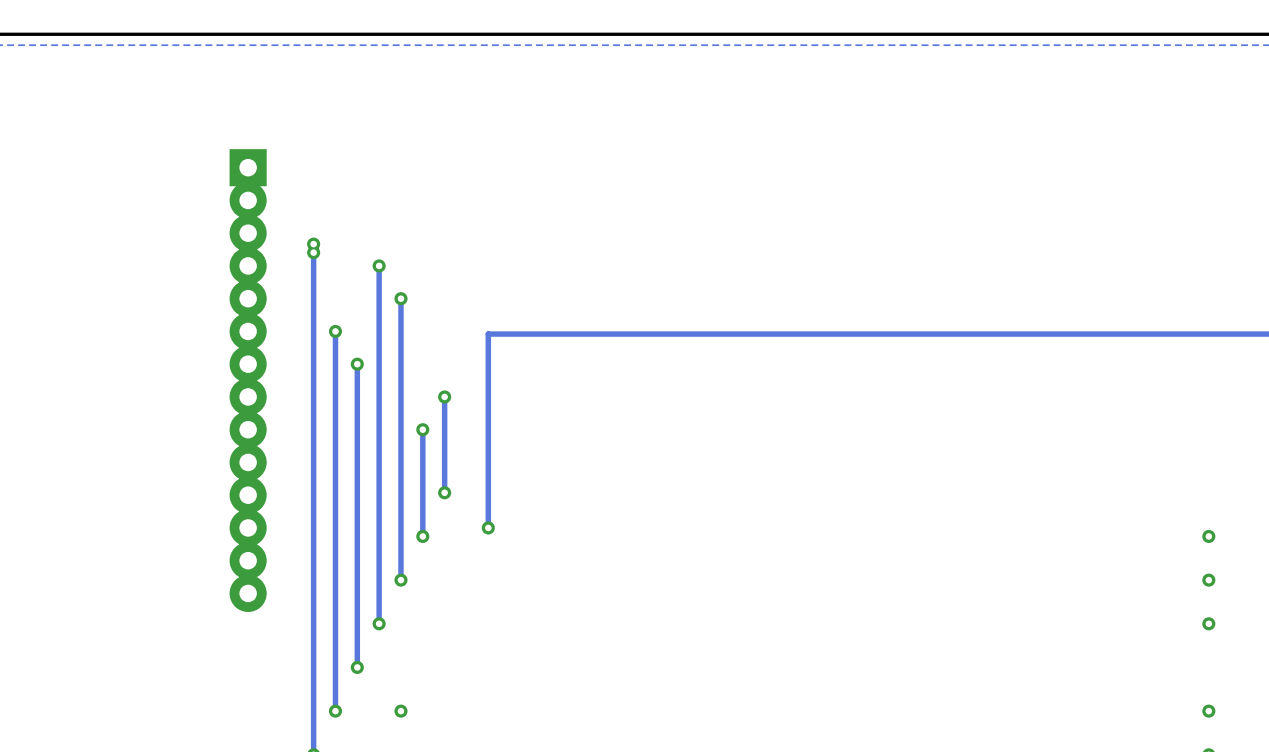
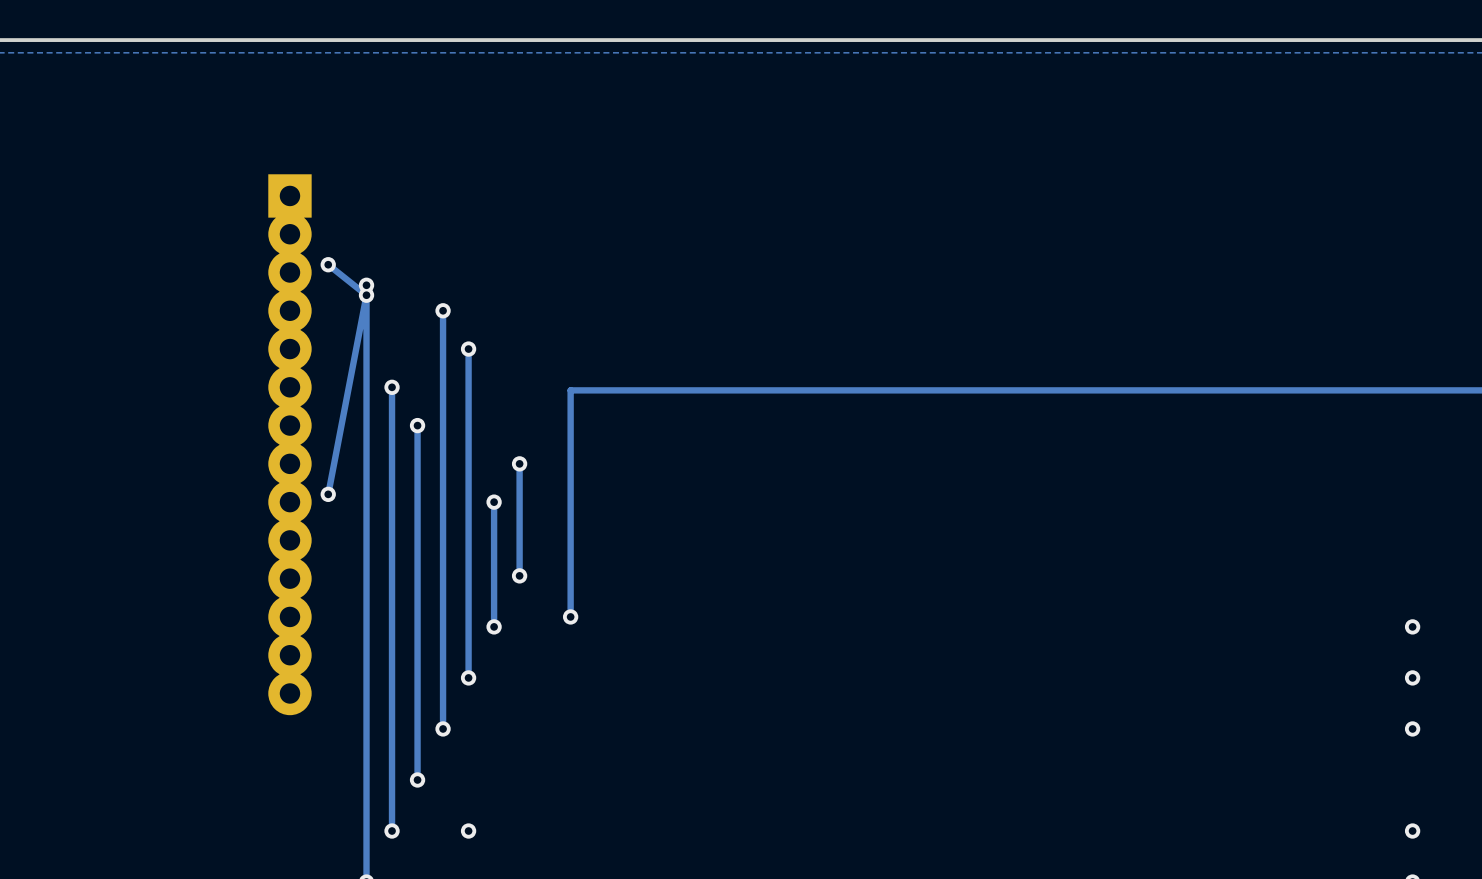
track: none -> (328, 264) (366, 295) (328, 494)
via: none -> (328, 264)
via: none -> (328, 494)

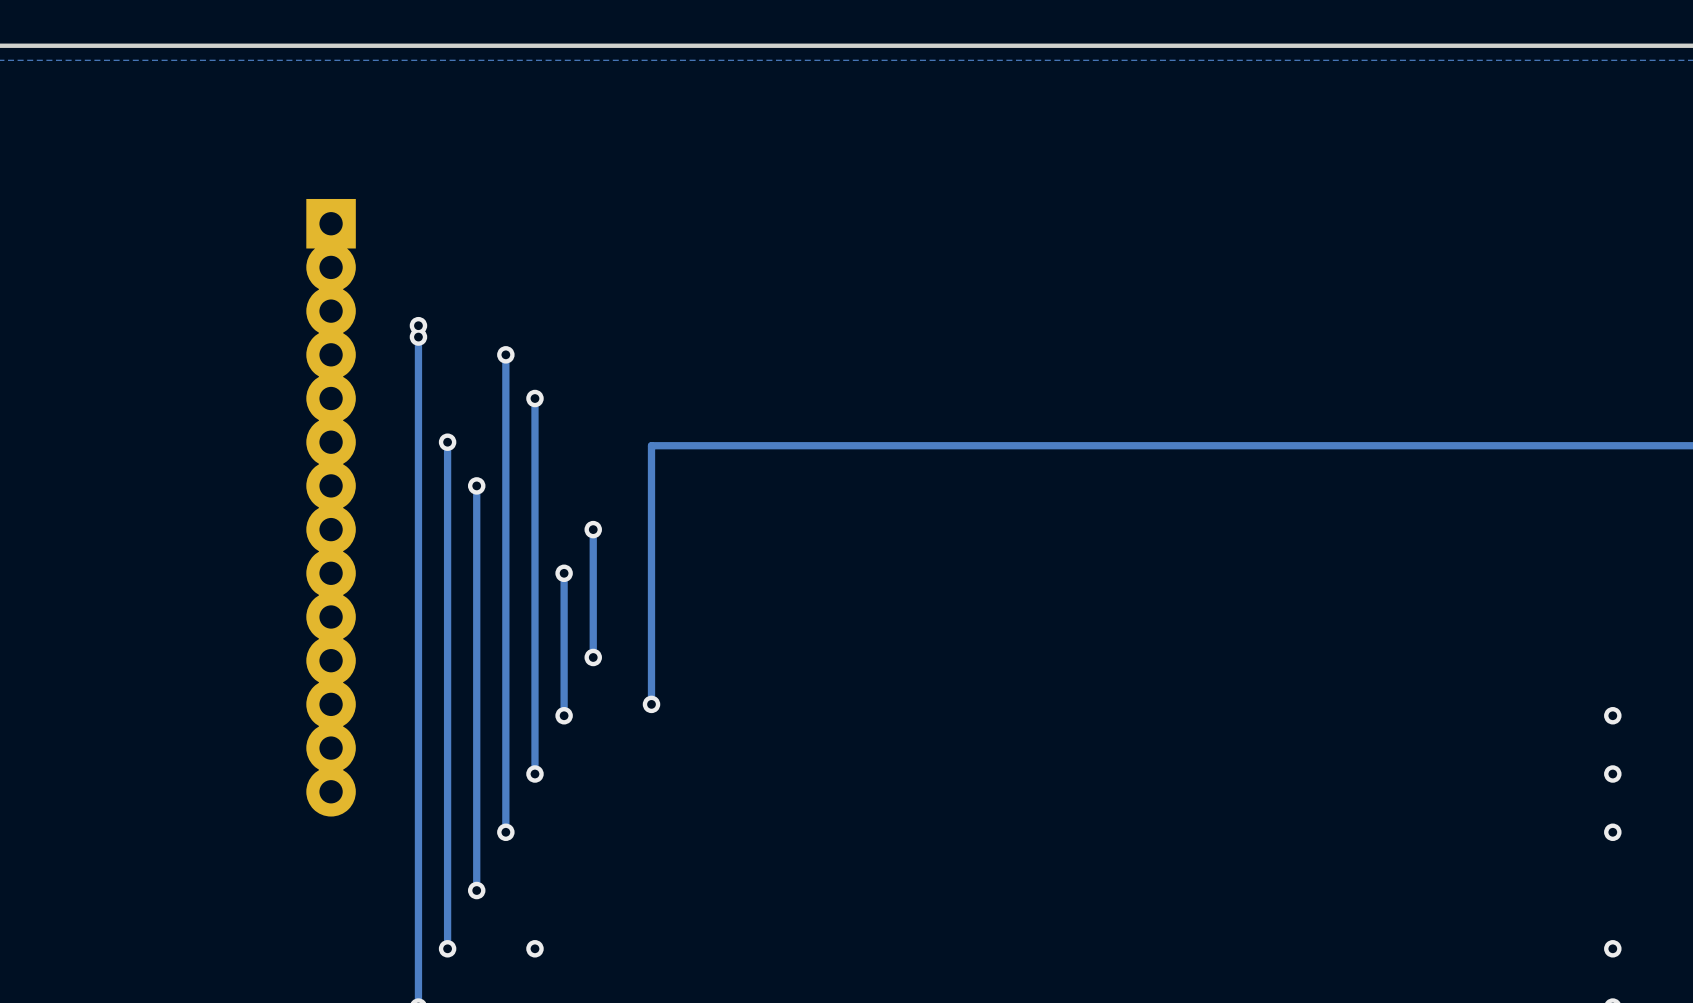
track: (328, 264) (366, 295) (328, 494) -> none
via: (328, 264) -> none
via: (328, 494) -> none

